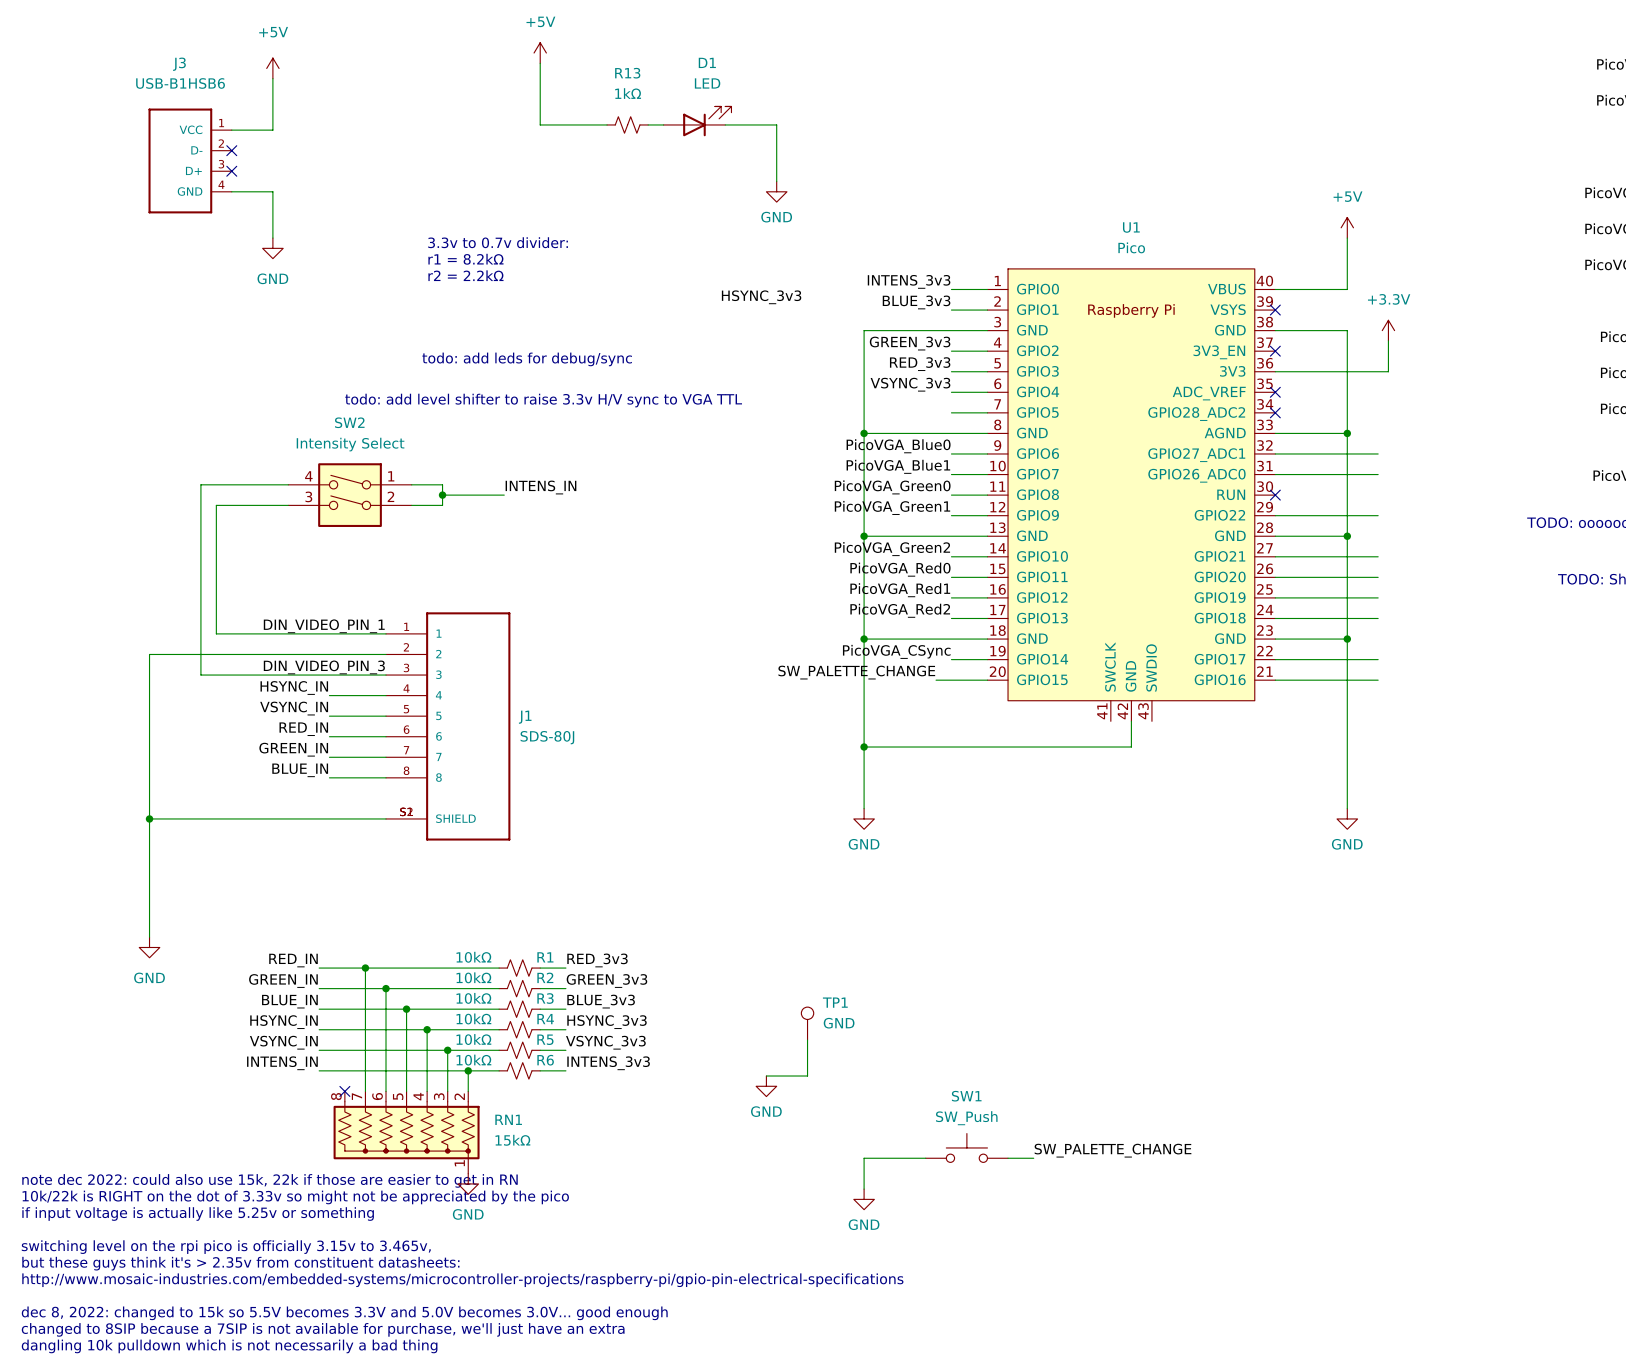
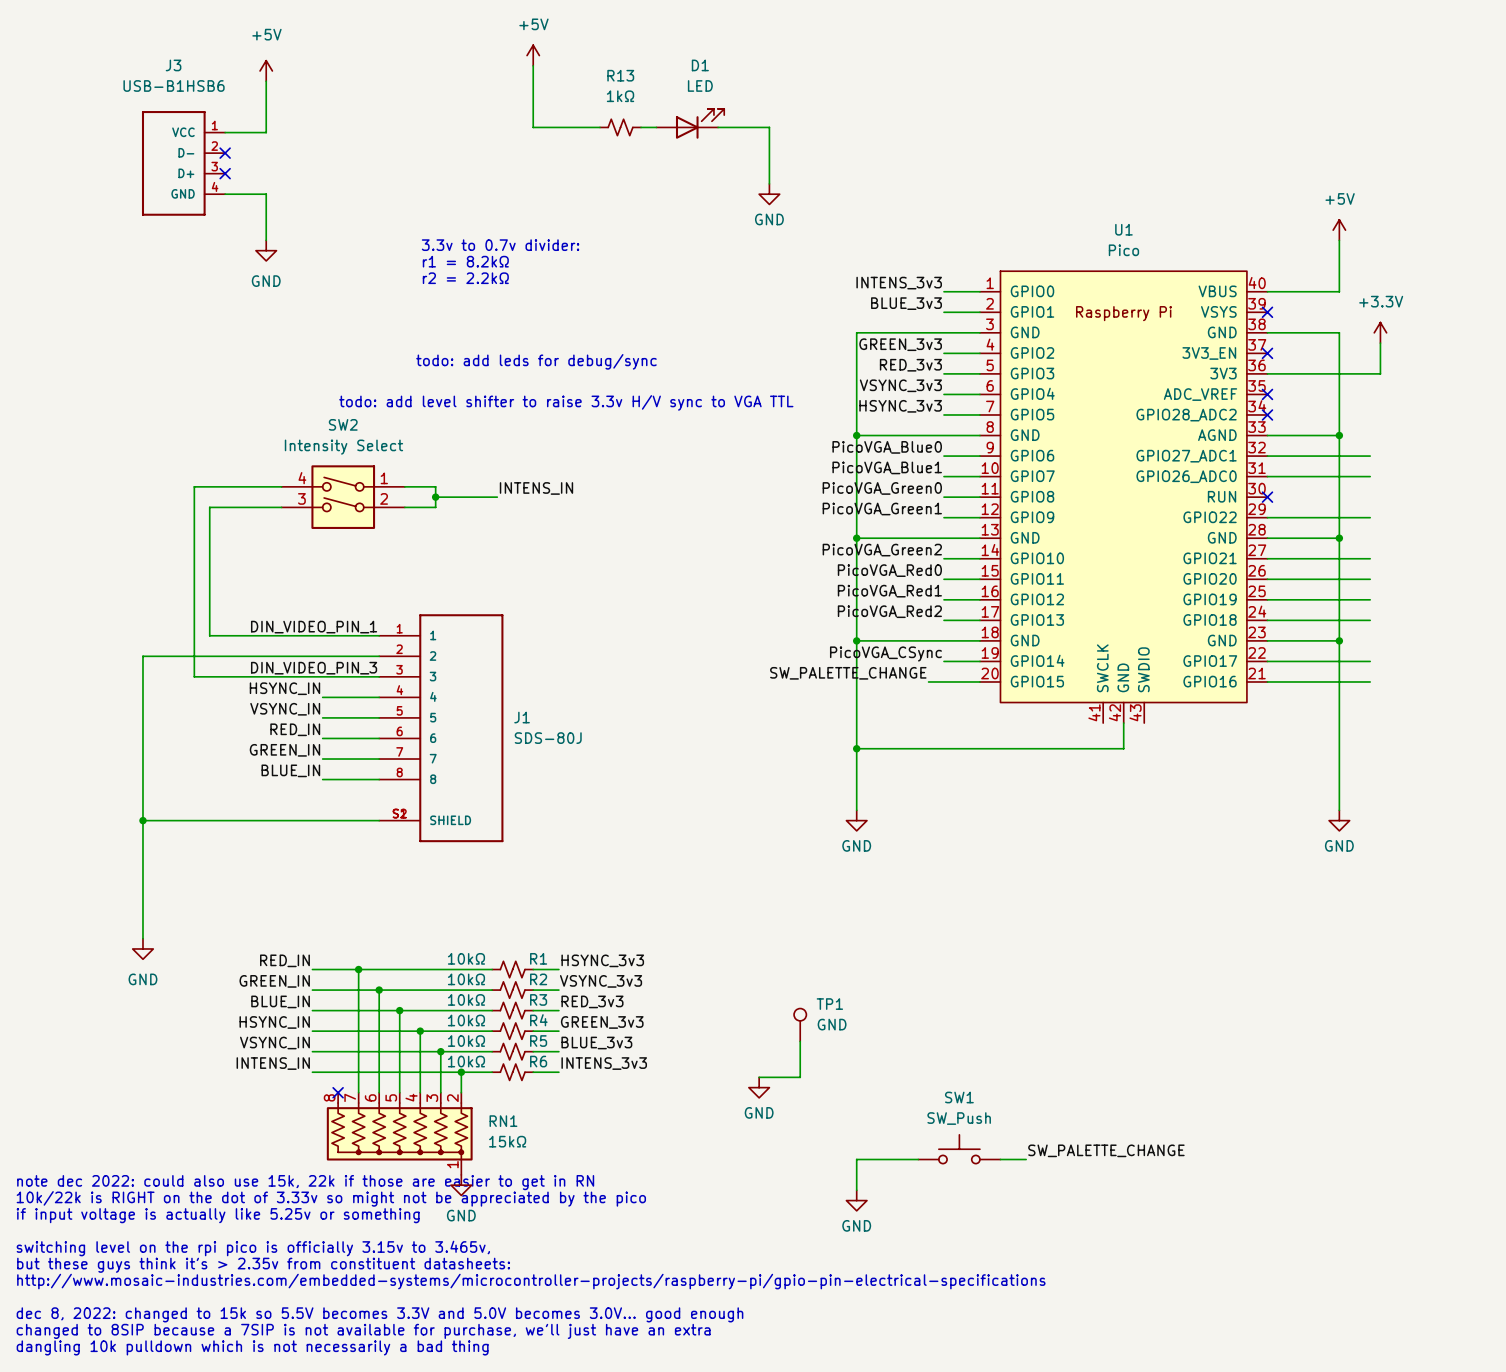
label position: HSYNC_3v3 (761, 297) -> HSYNC_3v3 (900, 406)
label: RED_3v3 (597, 960) -> HSYNC_3v3 (602, 960)
label: GREEN_3v3 (606, 981) -> VSYNC_3v3 (601, 981)
label: BLUE_3v3 (601, 1001) -> RED_3v3 (592, 1001)
label: HSYNC_3v3 (607, 1022) -> GREEN_3v3 (602, 1022)
label: VSYNC_3v3 (605, 1042) -> BLUE_3v3 (596, 1043)

